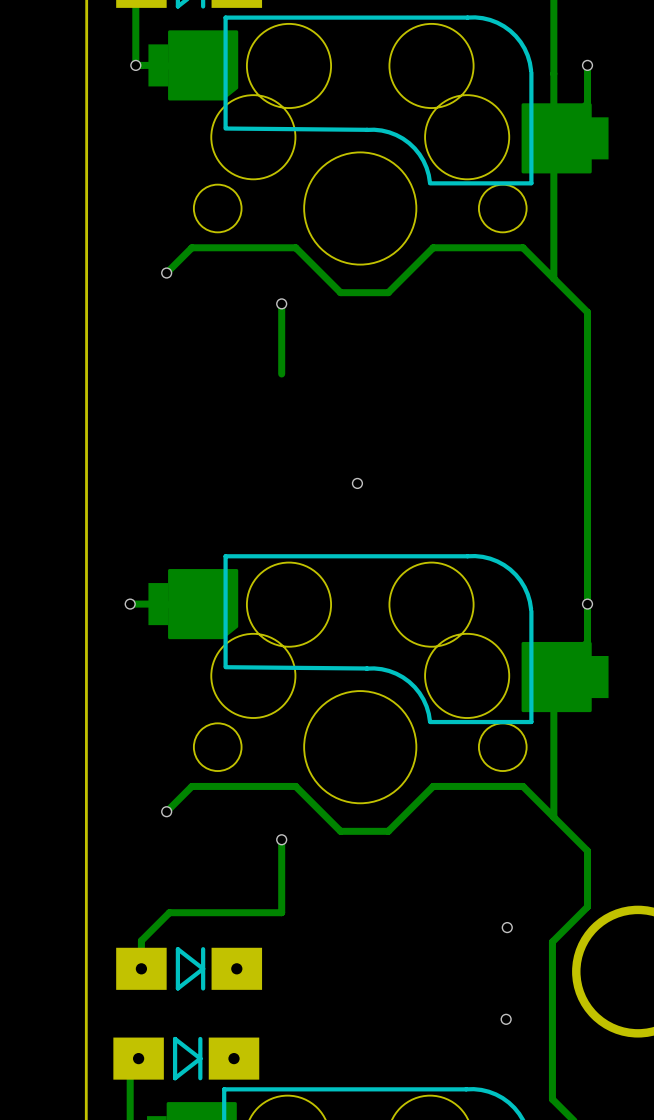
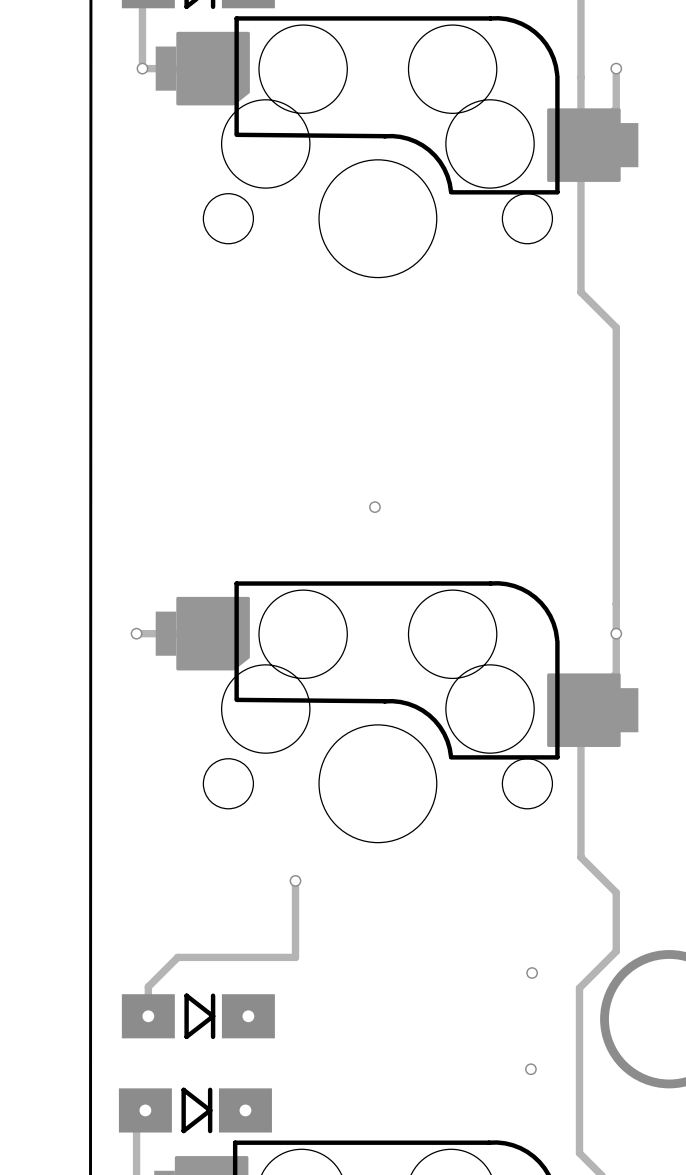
track: (166, 273) (191, 247) (295, 247) (340, 292) (388, 292) (433, 247) (522, 247) (553, 278) -> none
via: (166, 273) -> none
track: (281, 303) (281, 374) -> none
via: (281, 303) -> none
track: (166, 811) (191, 786) (295, 786) (340, 831) (388, 831) (433, 786) (522, 786) (553, 817) -> none
via: (166, 811) -> none

